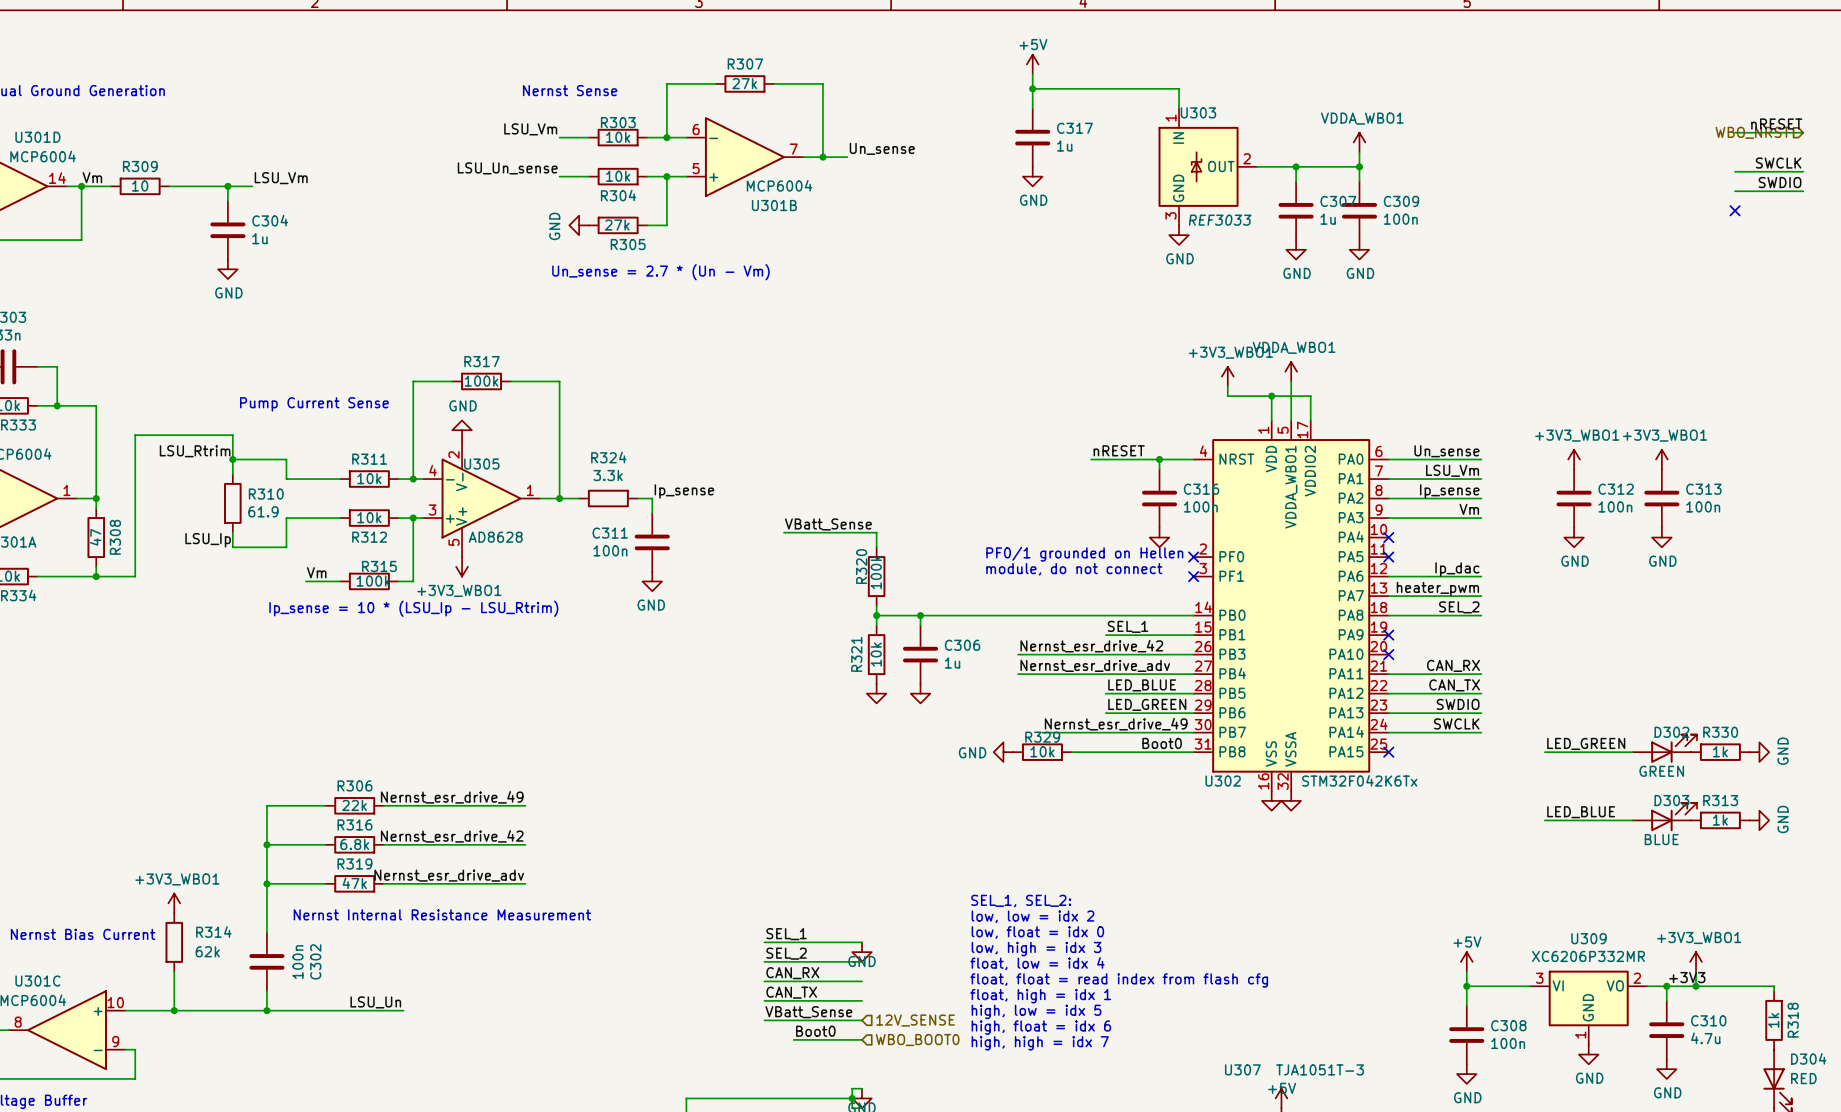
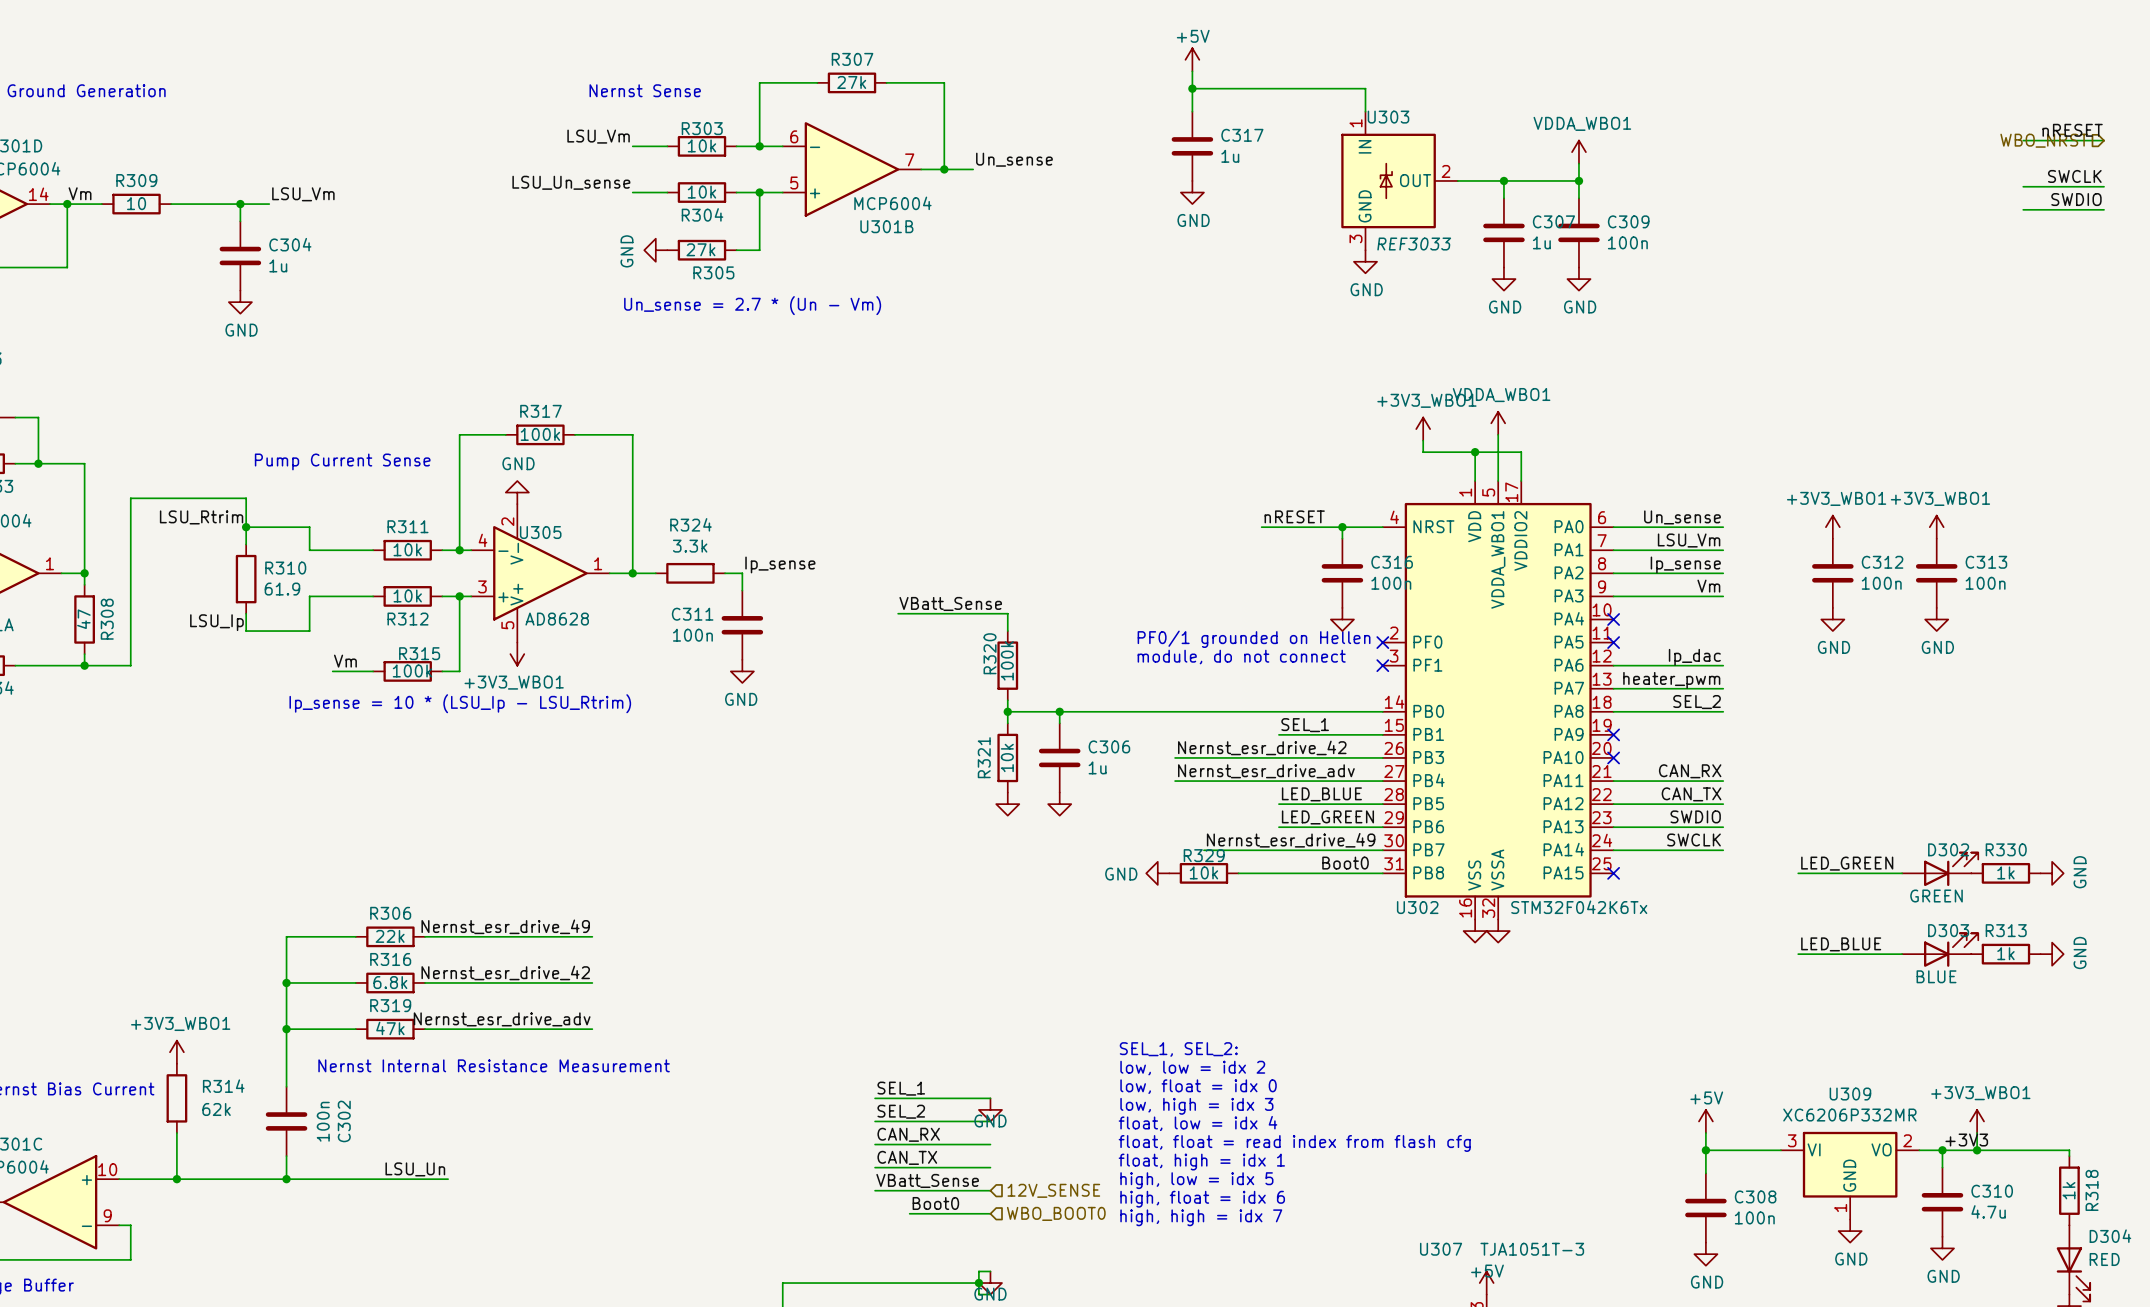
no-connect mark: (1735, 210) -> none

